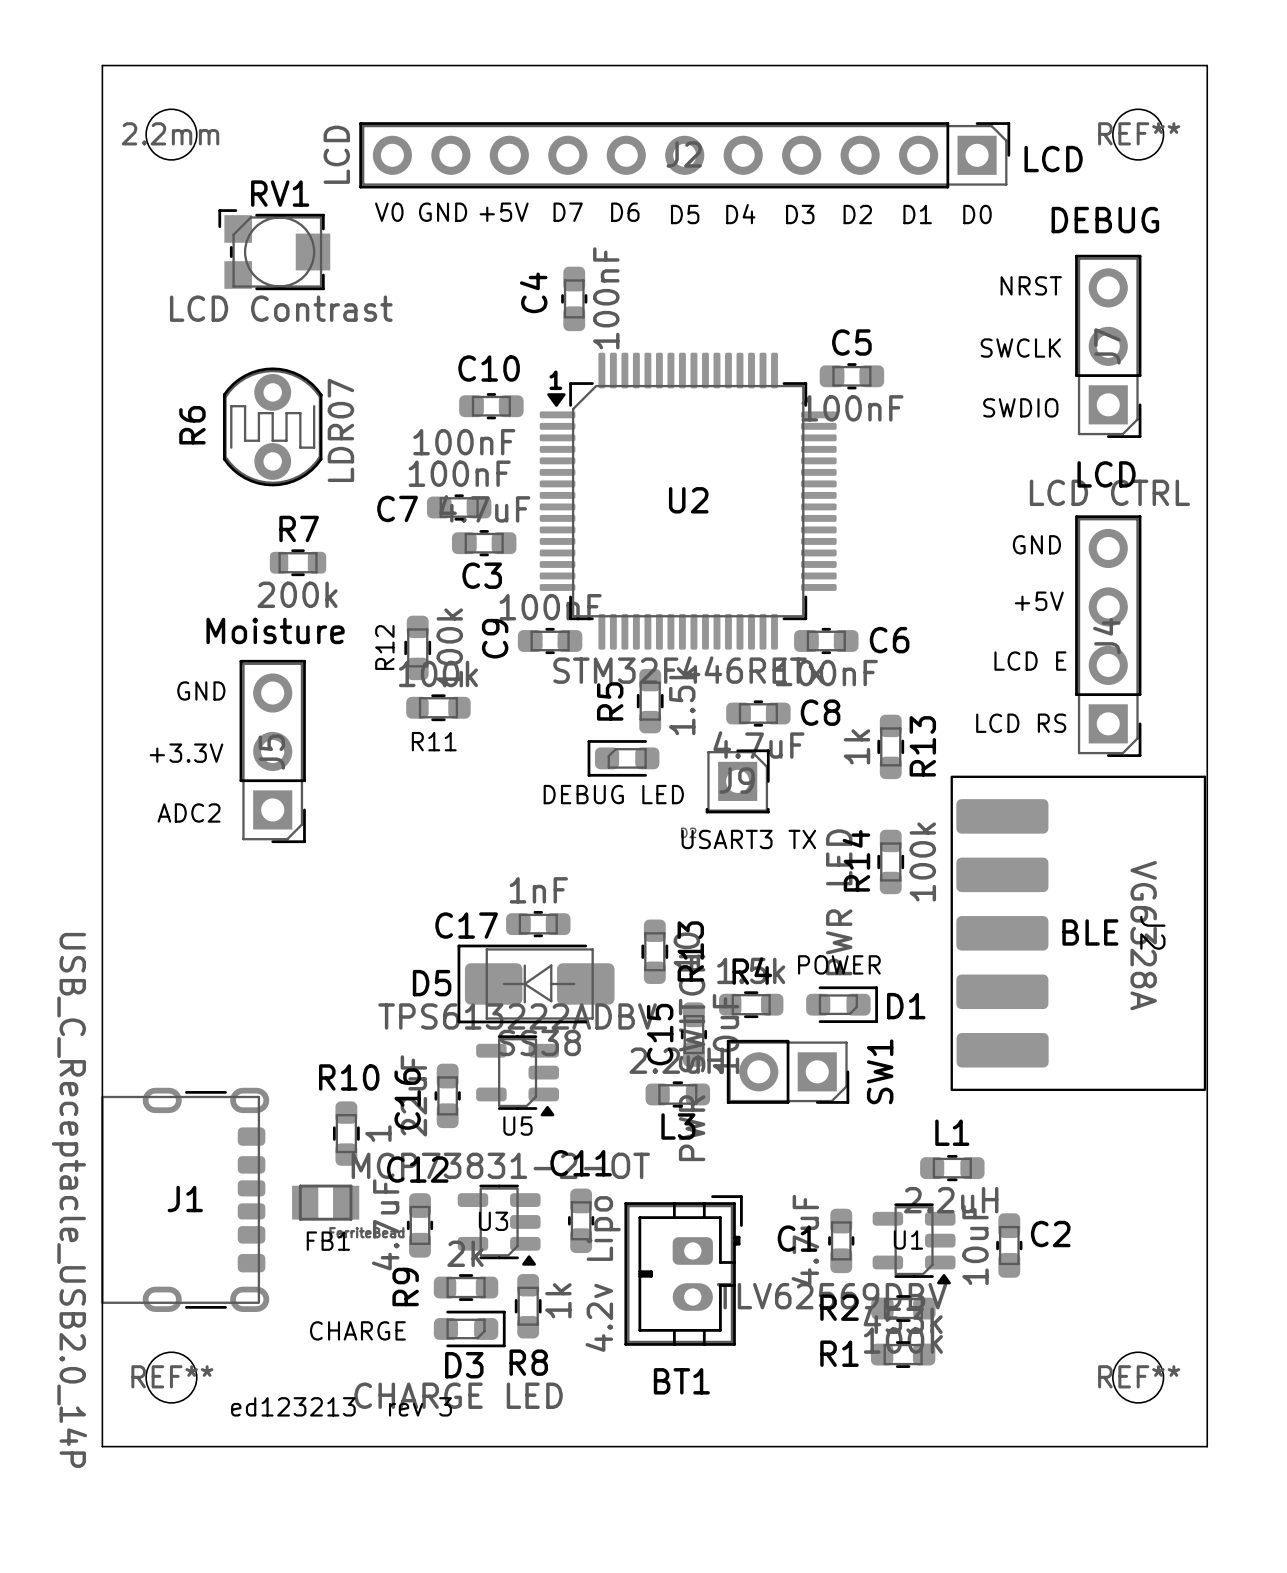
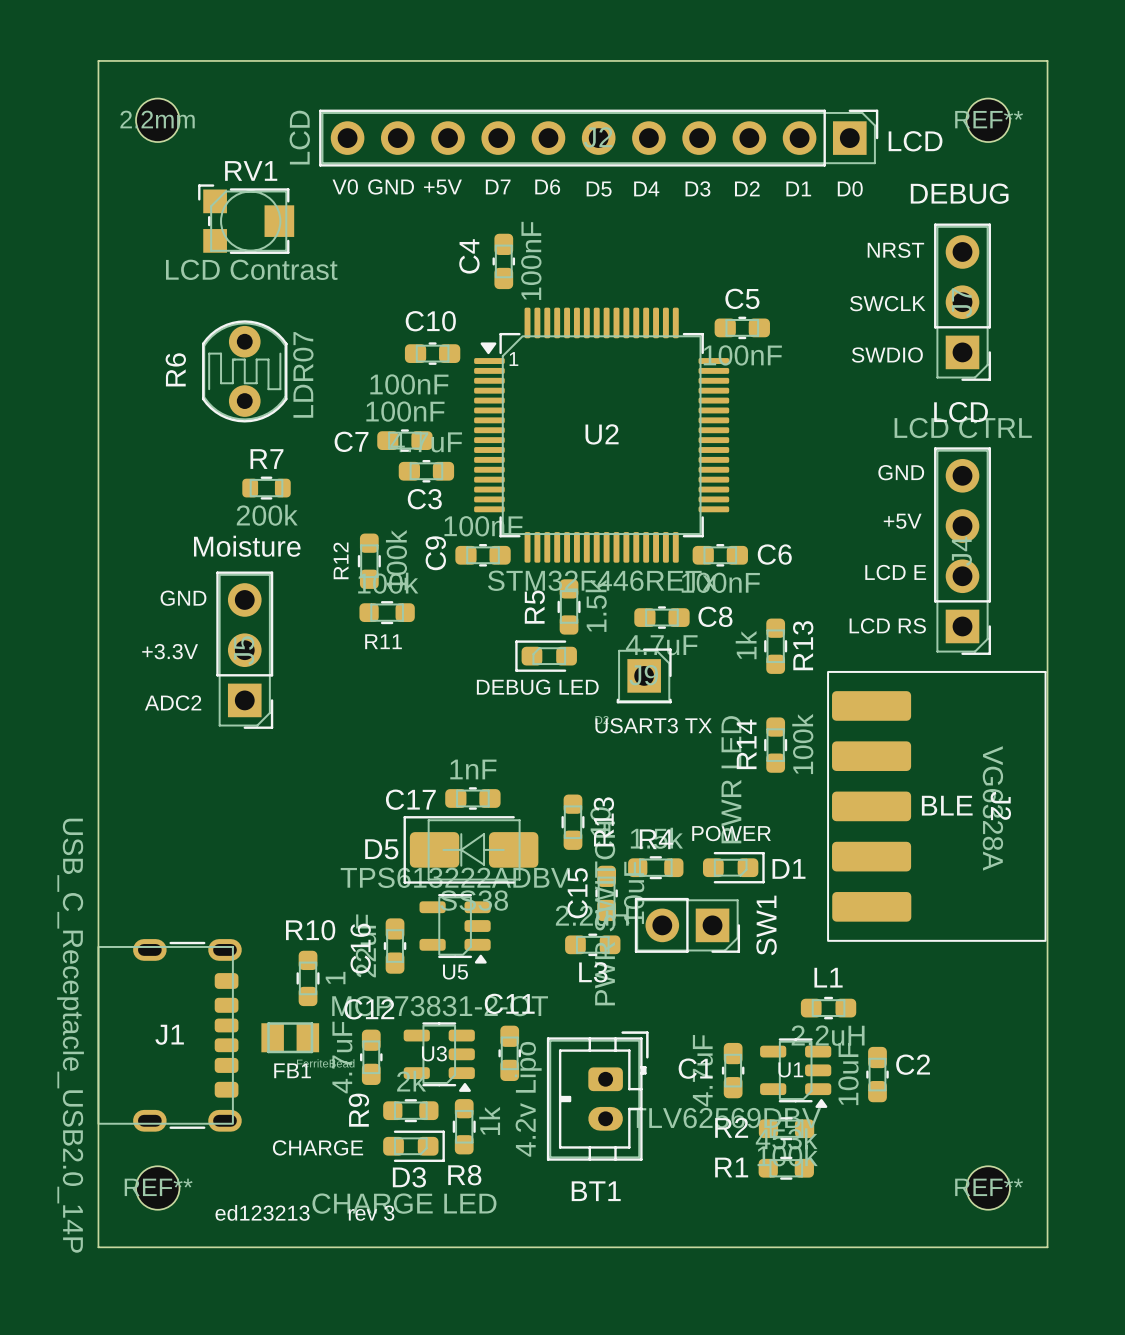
text position: 1 (555, 380) -> 1 (513, 359)

